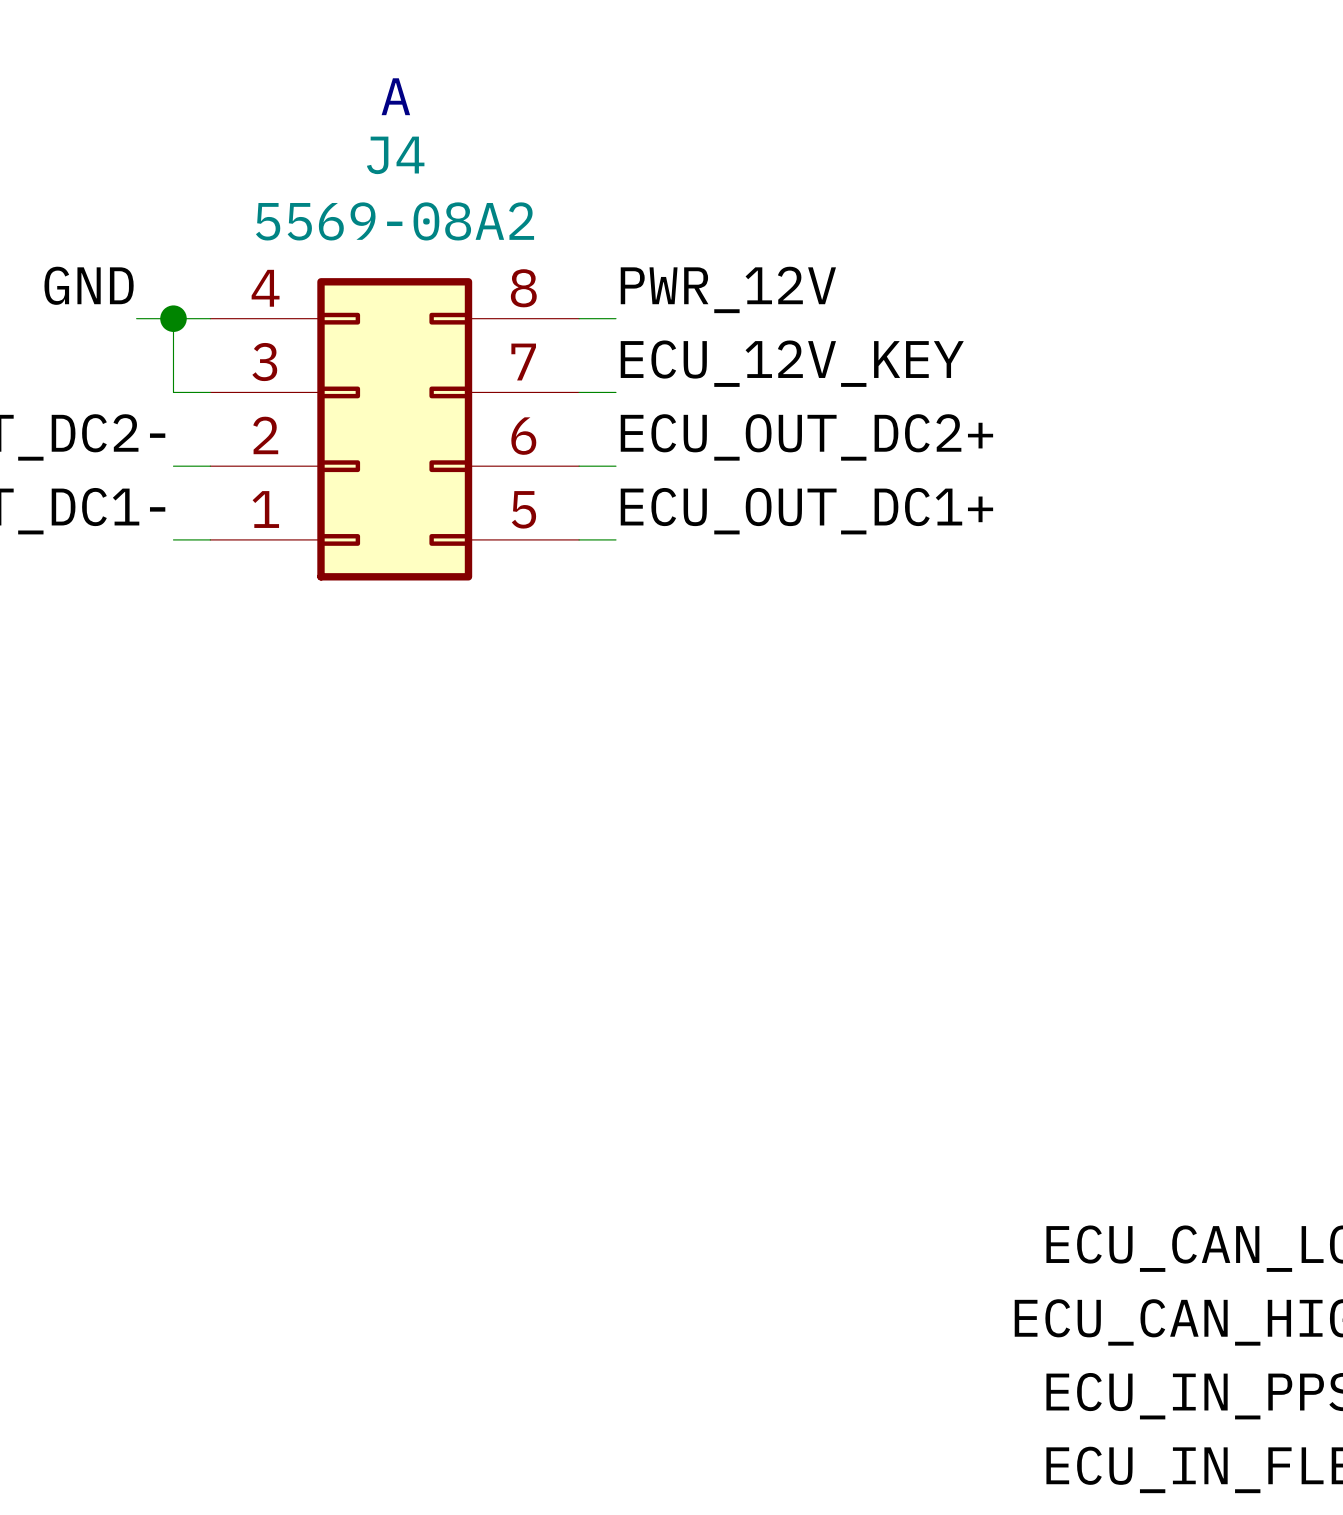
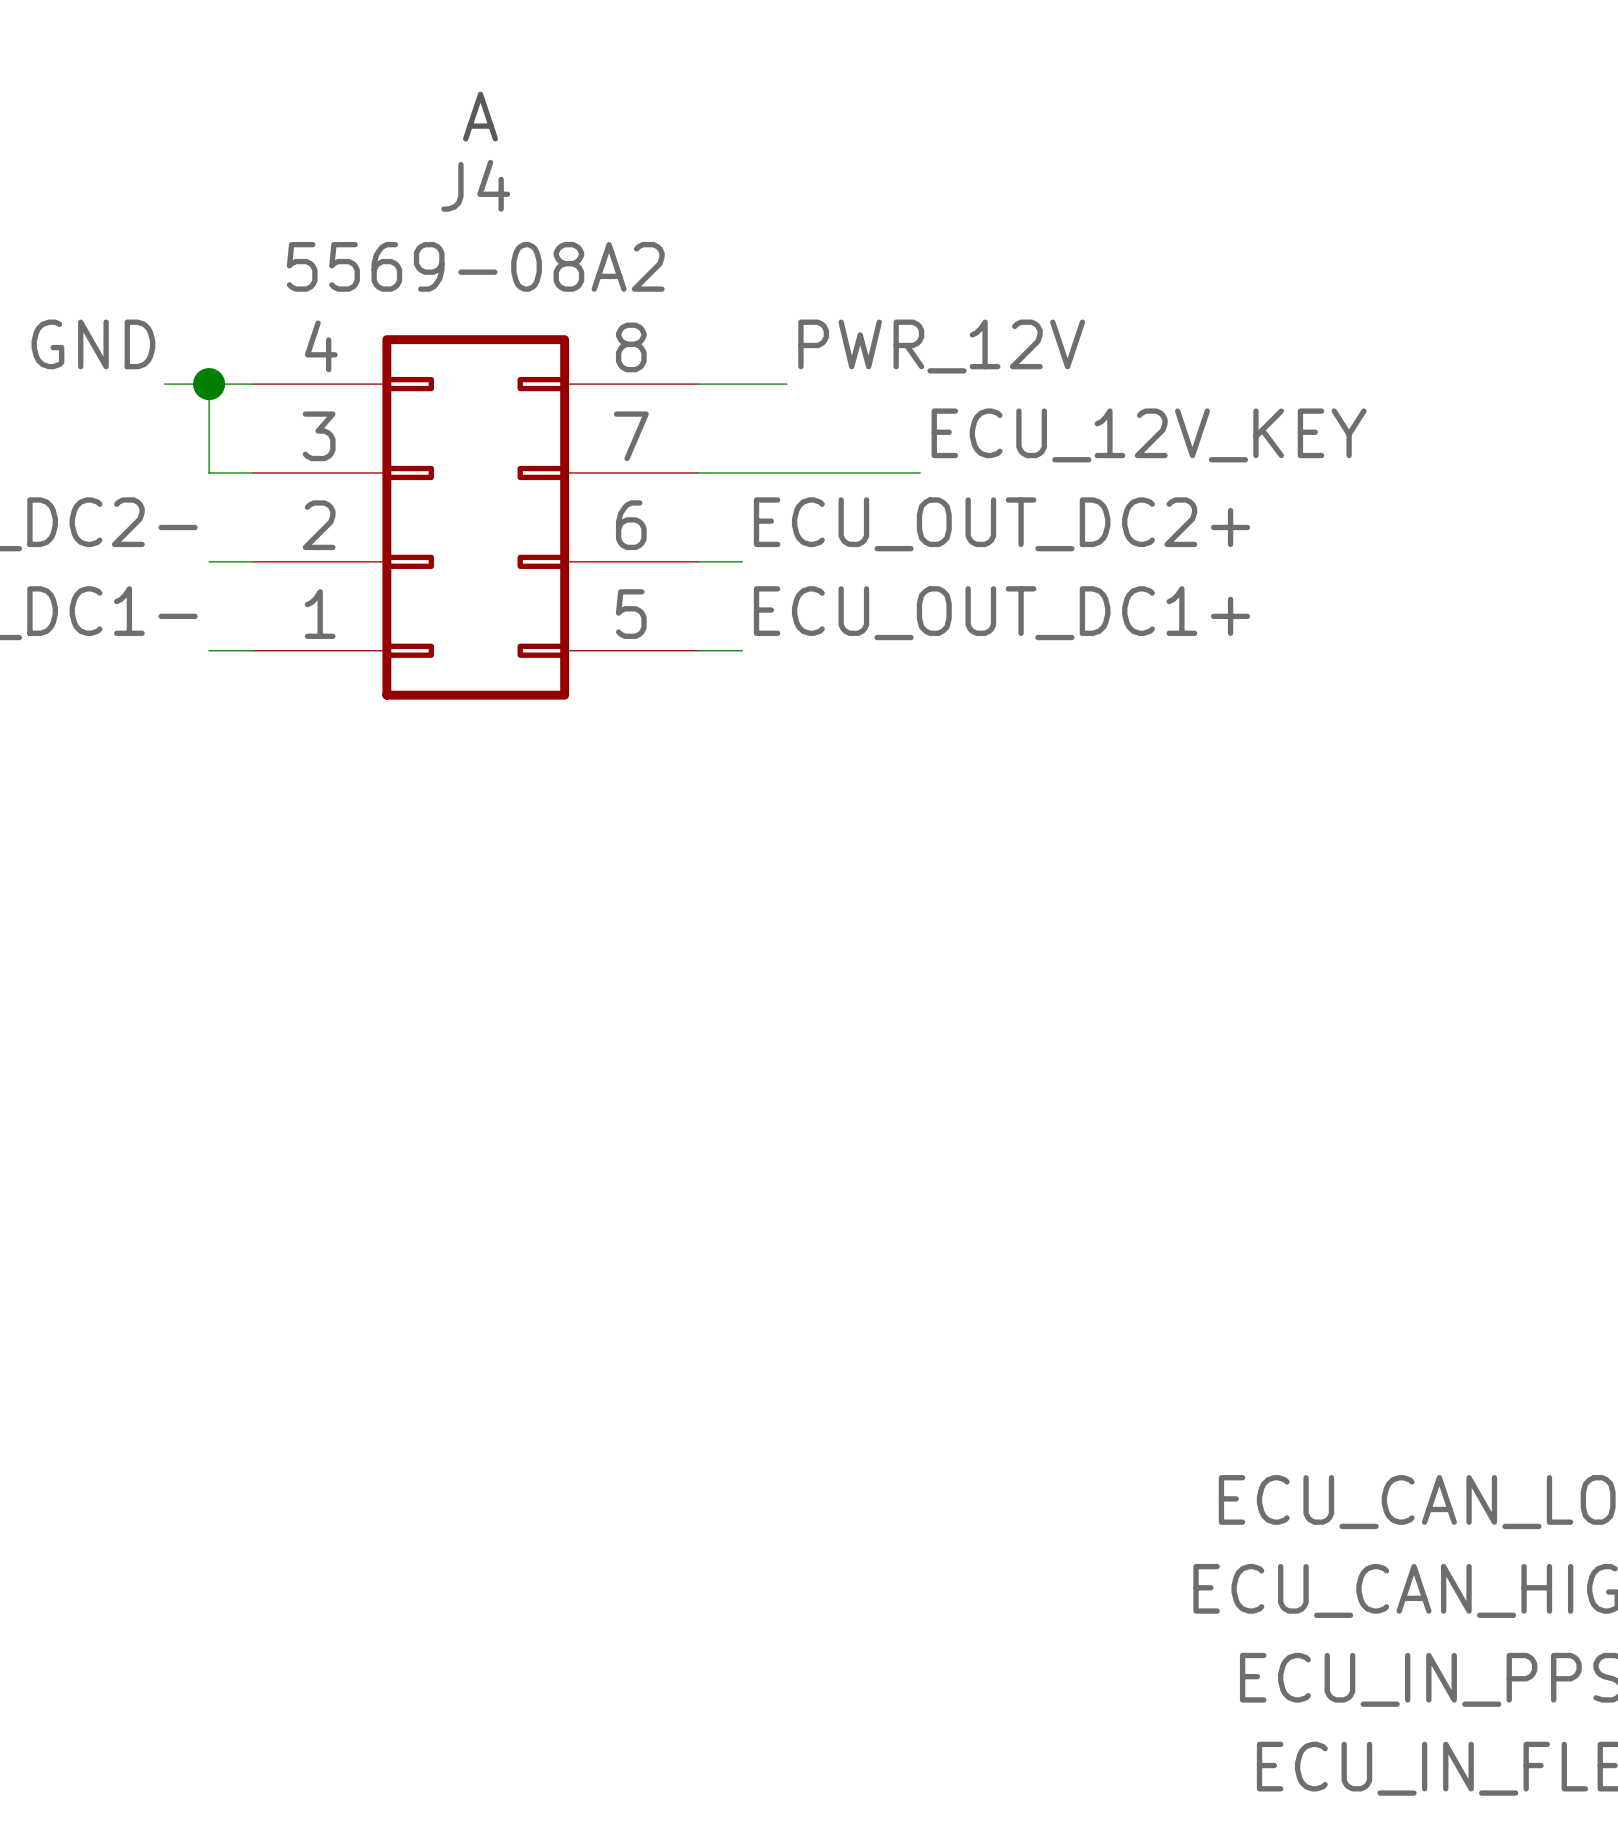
label position: PWR_12V (728, 289) -> PWR_12V (941, 346)
wire: none -> (742, 384) (786, 384)
label position: ECU_12V_KEY (792, 363) -> ECU_12V_KEY (1149, 435)
wire: none -> (742, 472) (920, 472)

